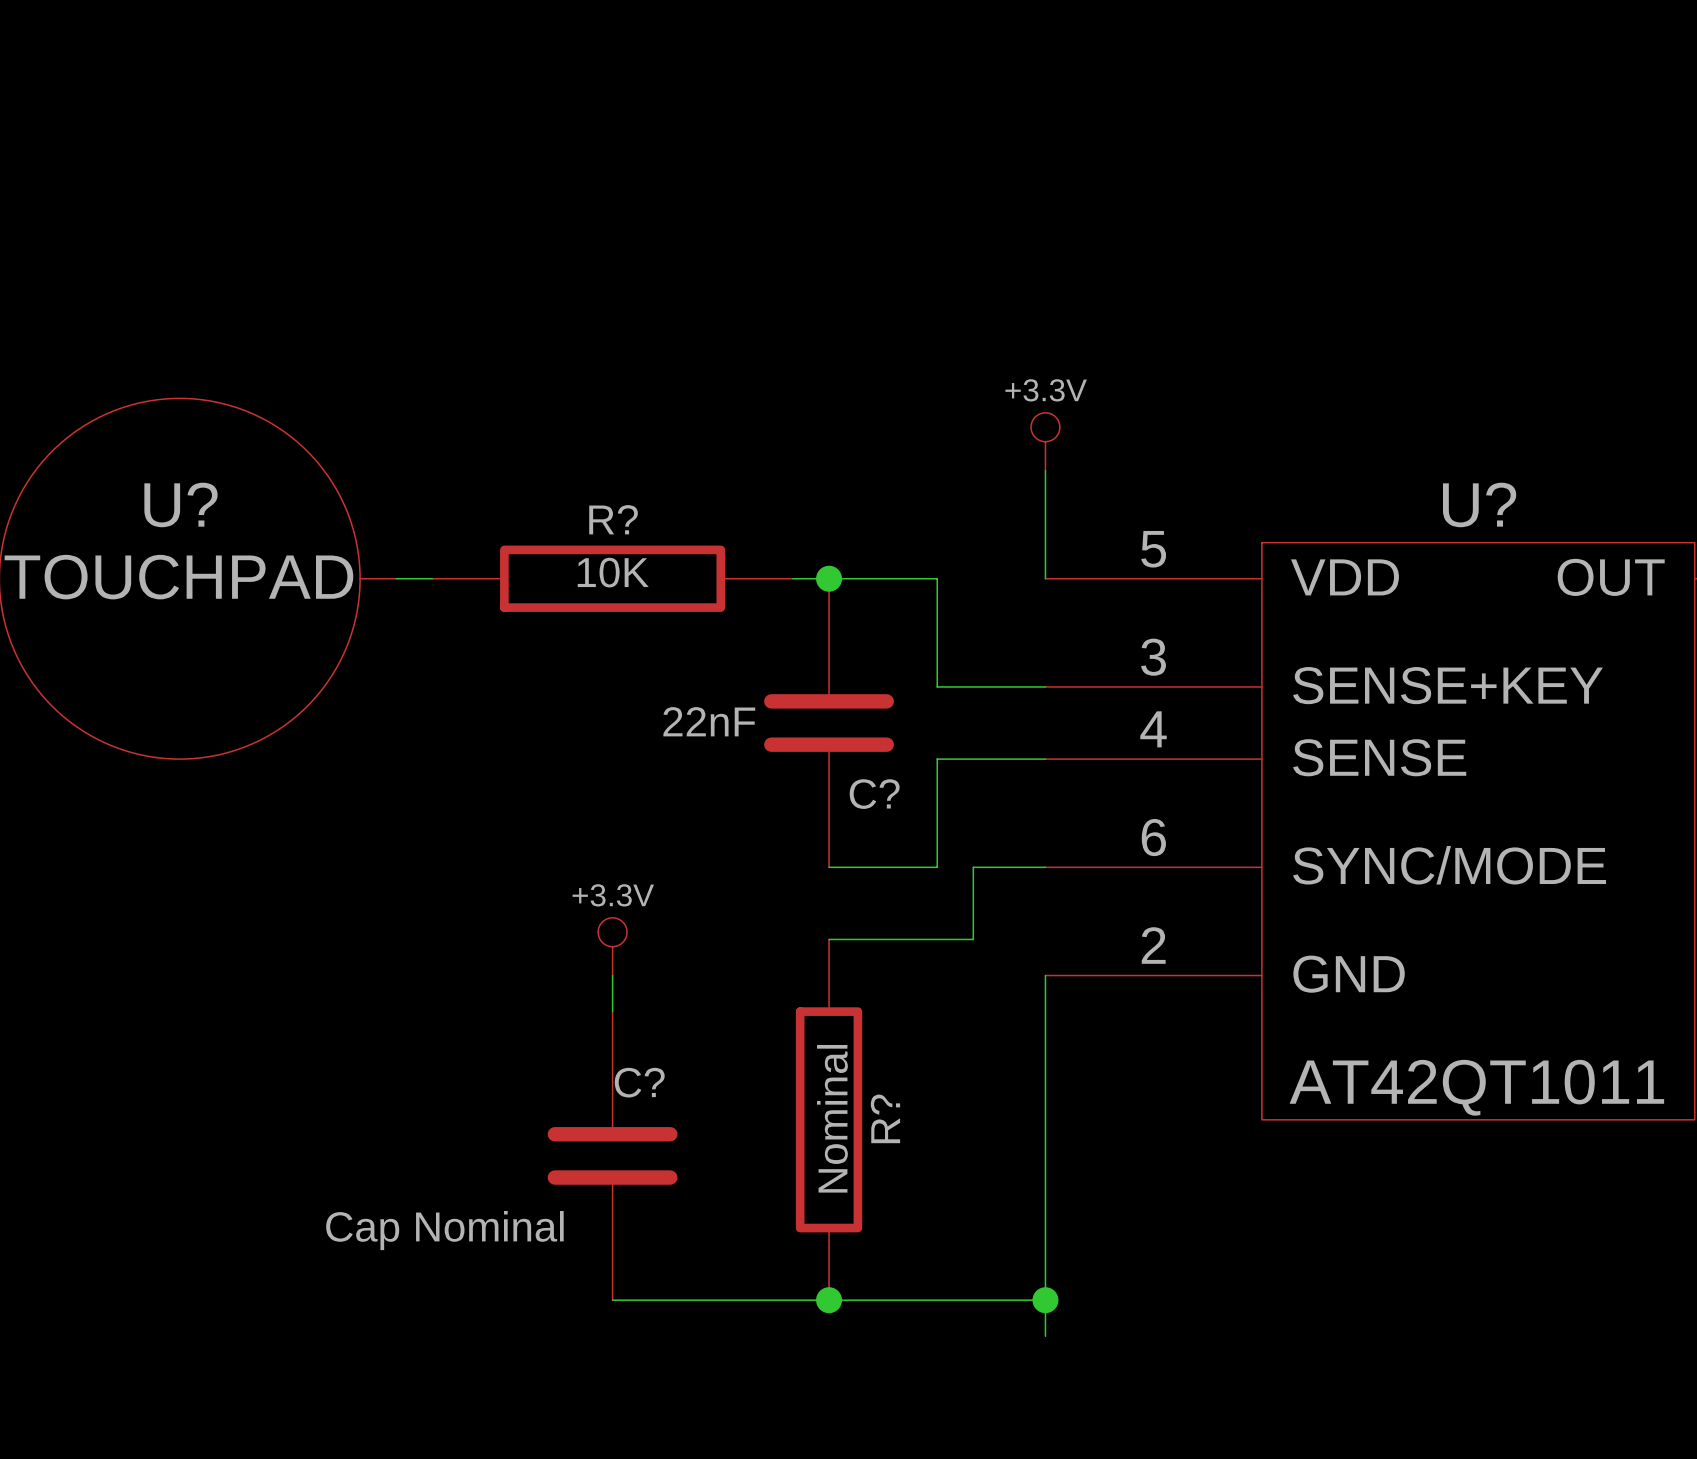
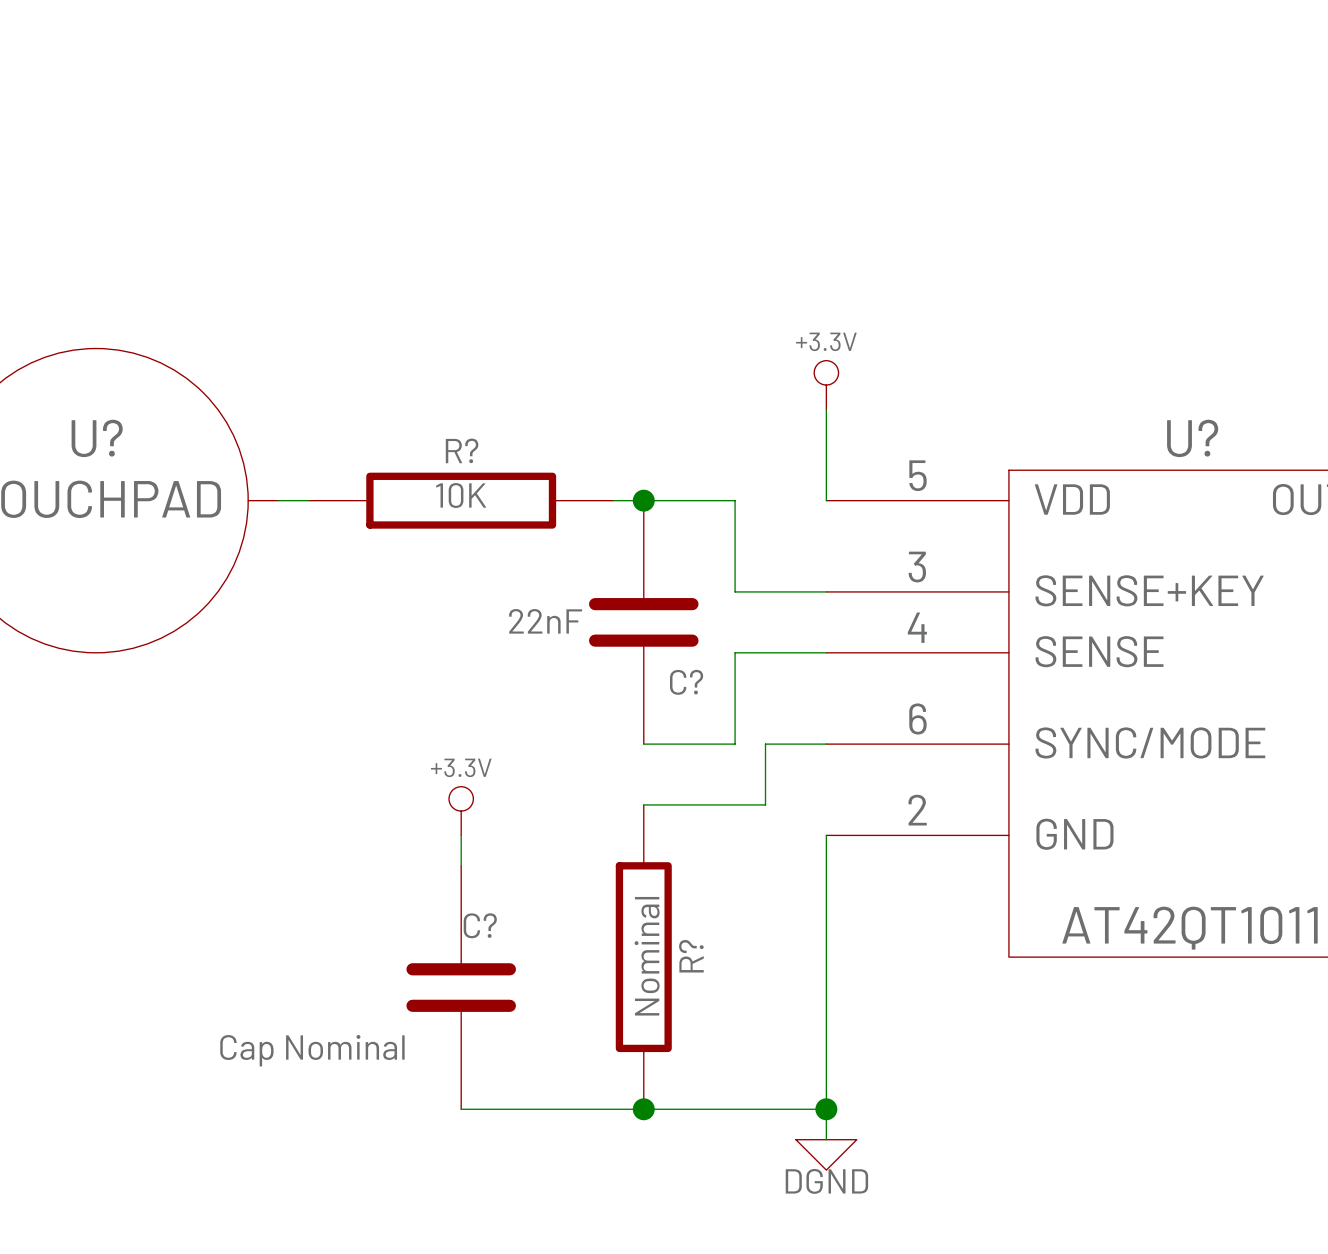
power symbol: none -> DGND (826, 1154)

